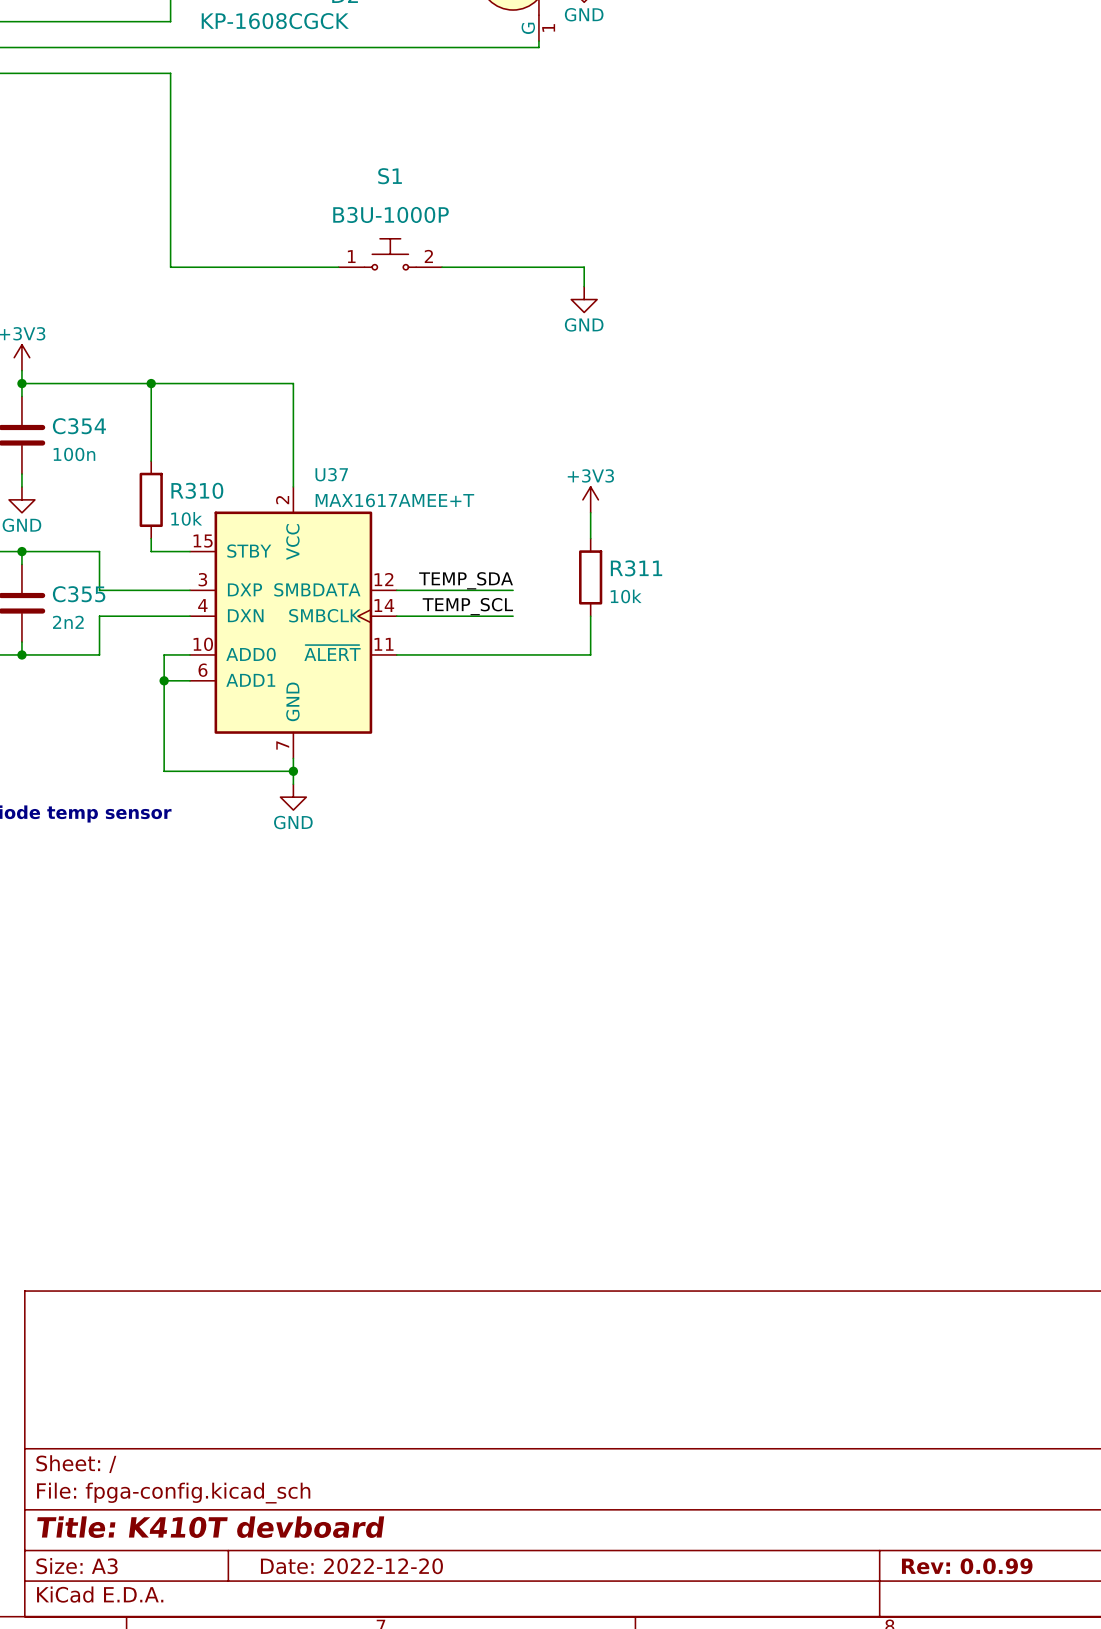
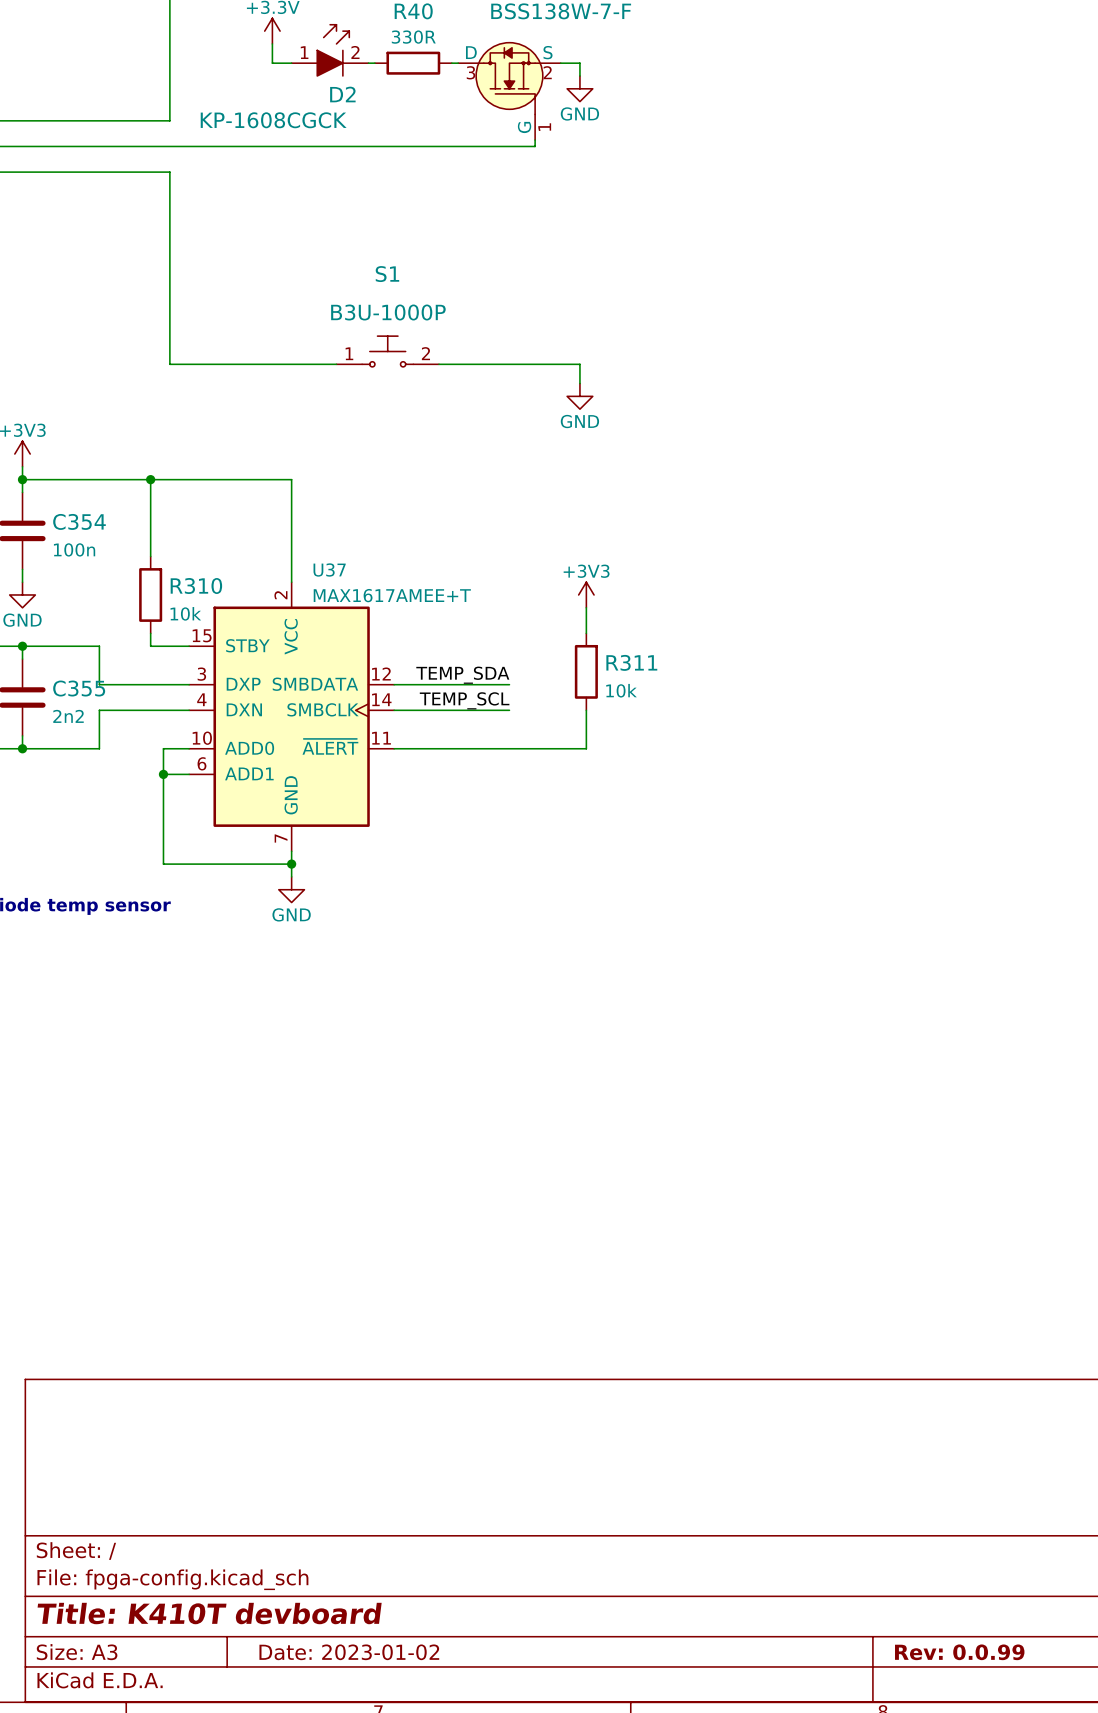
title block: Date: 2022-12-20 (351, 1566) -> Date: 2023-01-02 (349, 1652)

